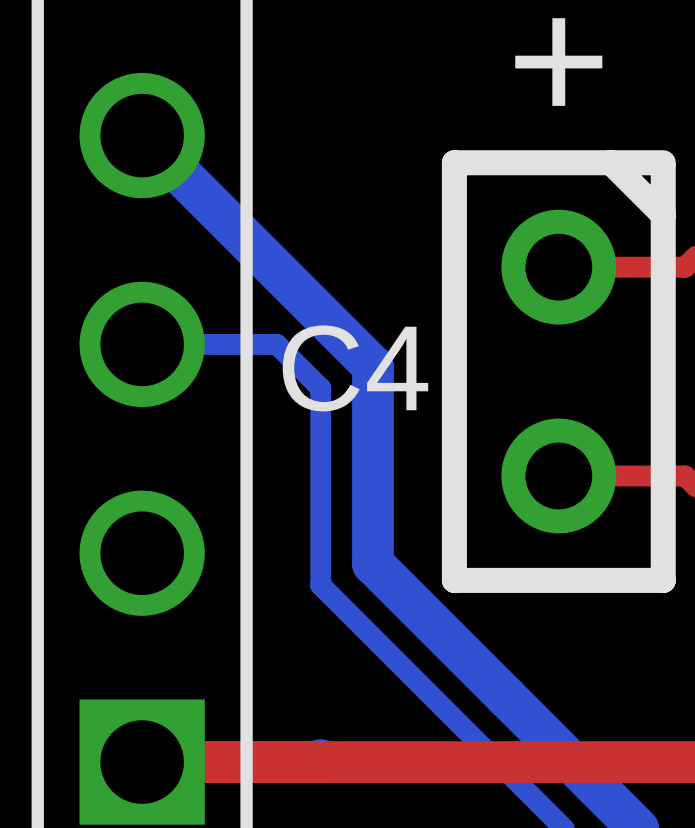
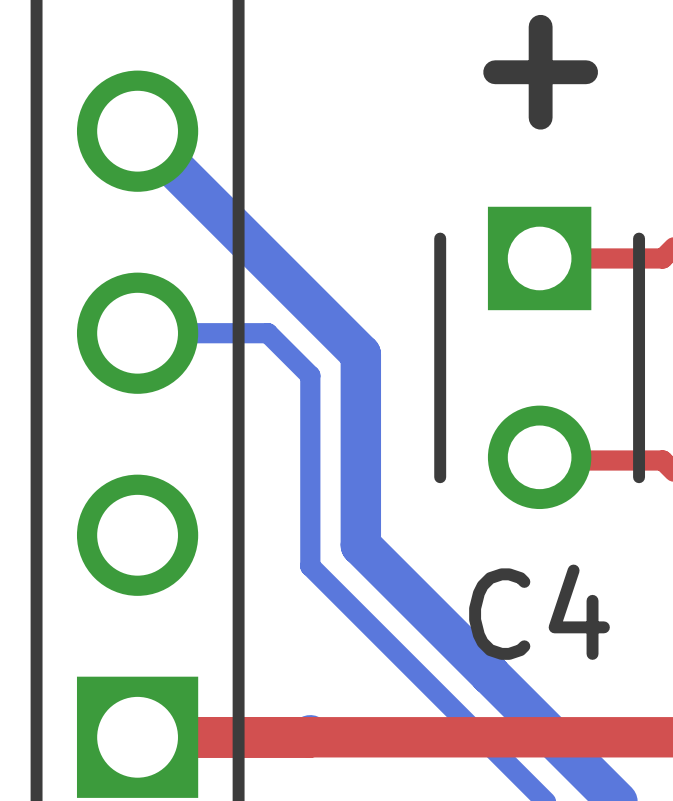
C4 footprint: [441, 150, 676, 593] -> [434, 206, 646, 510]
C4 name position: C4 (355, 368) -> C4 (539, 612)

